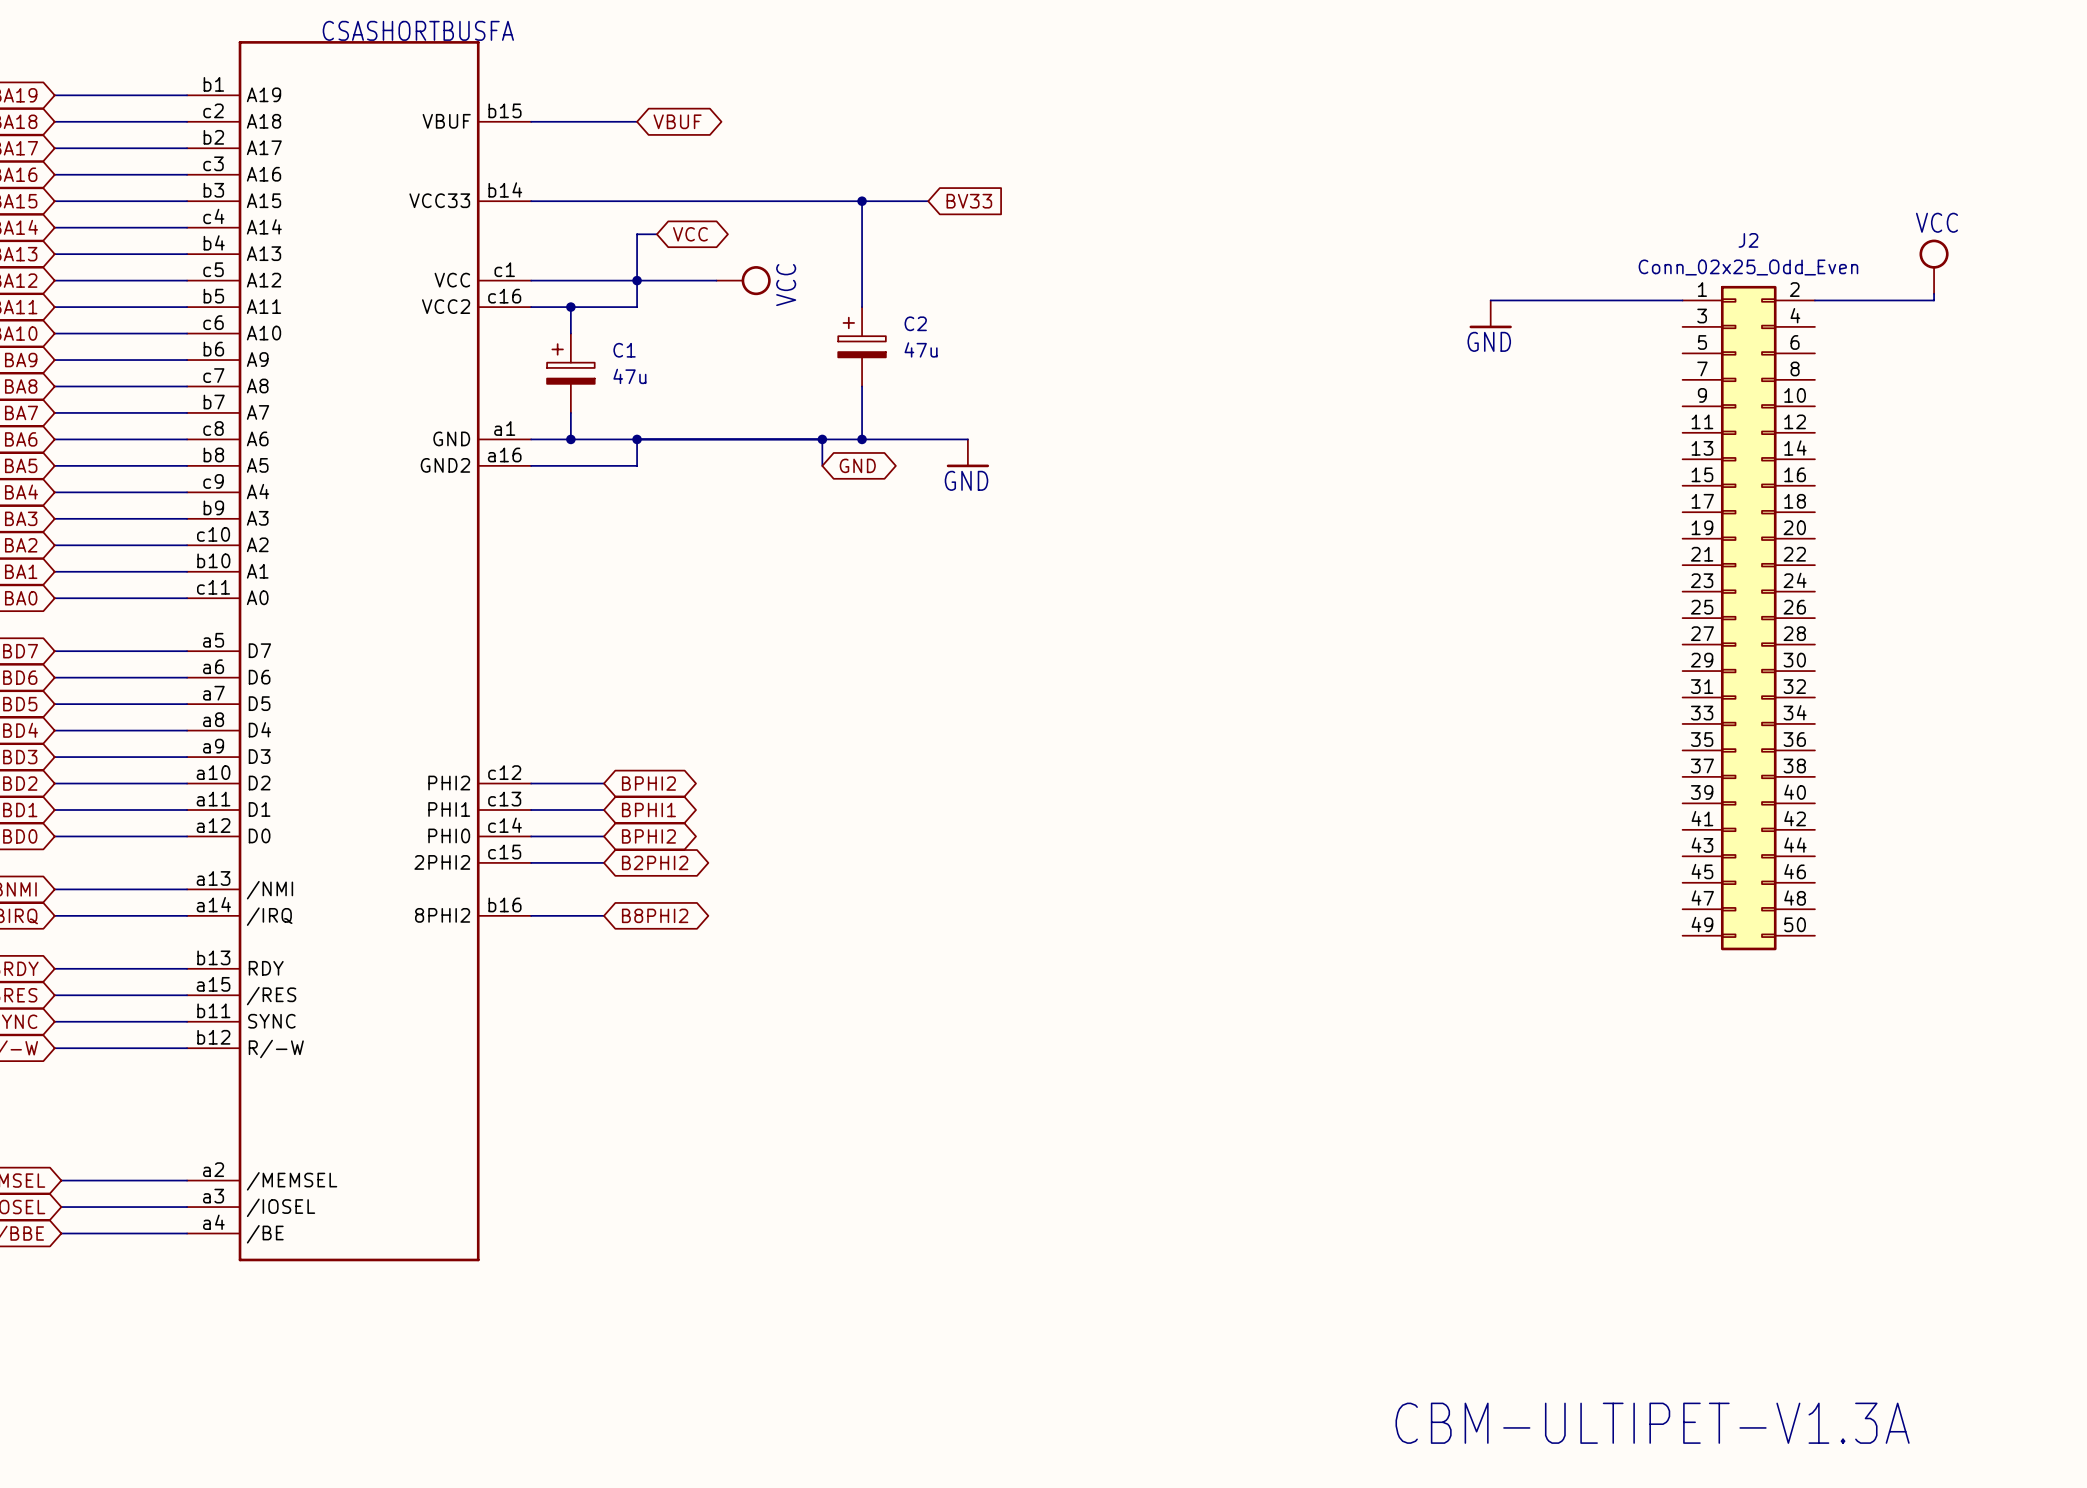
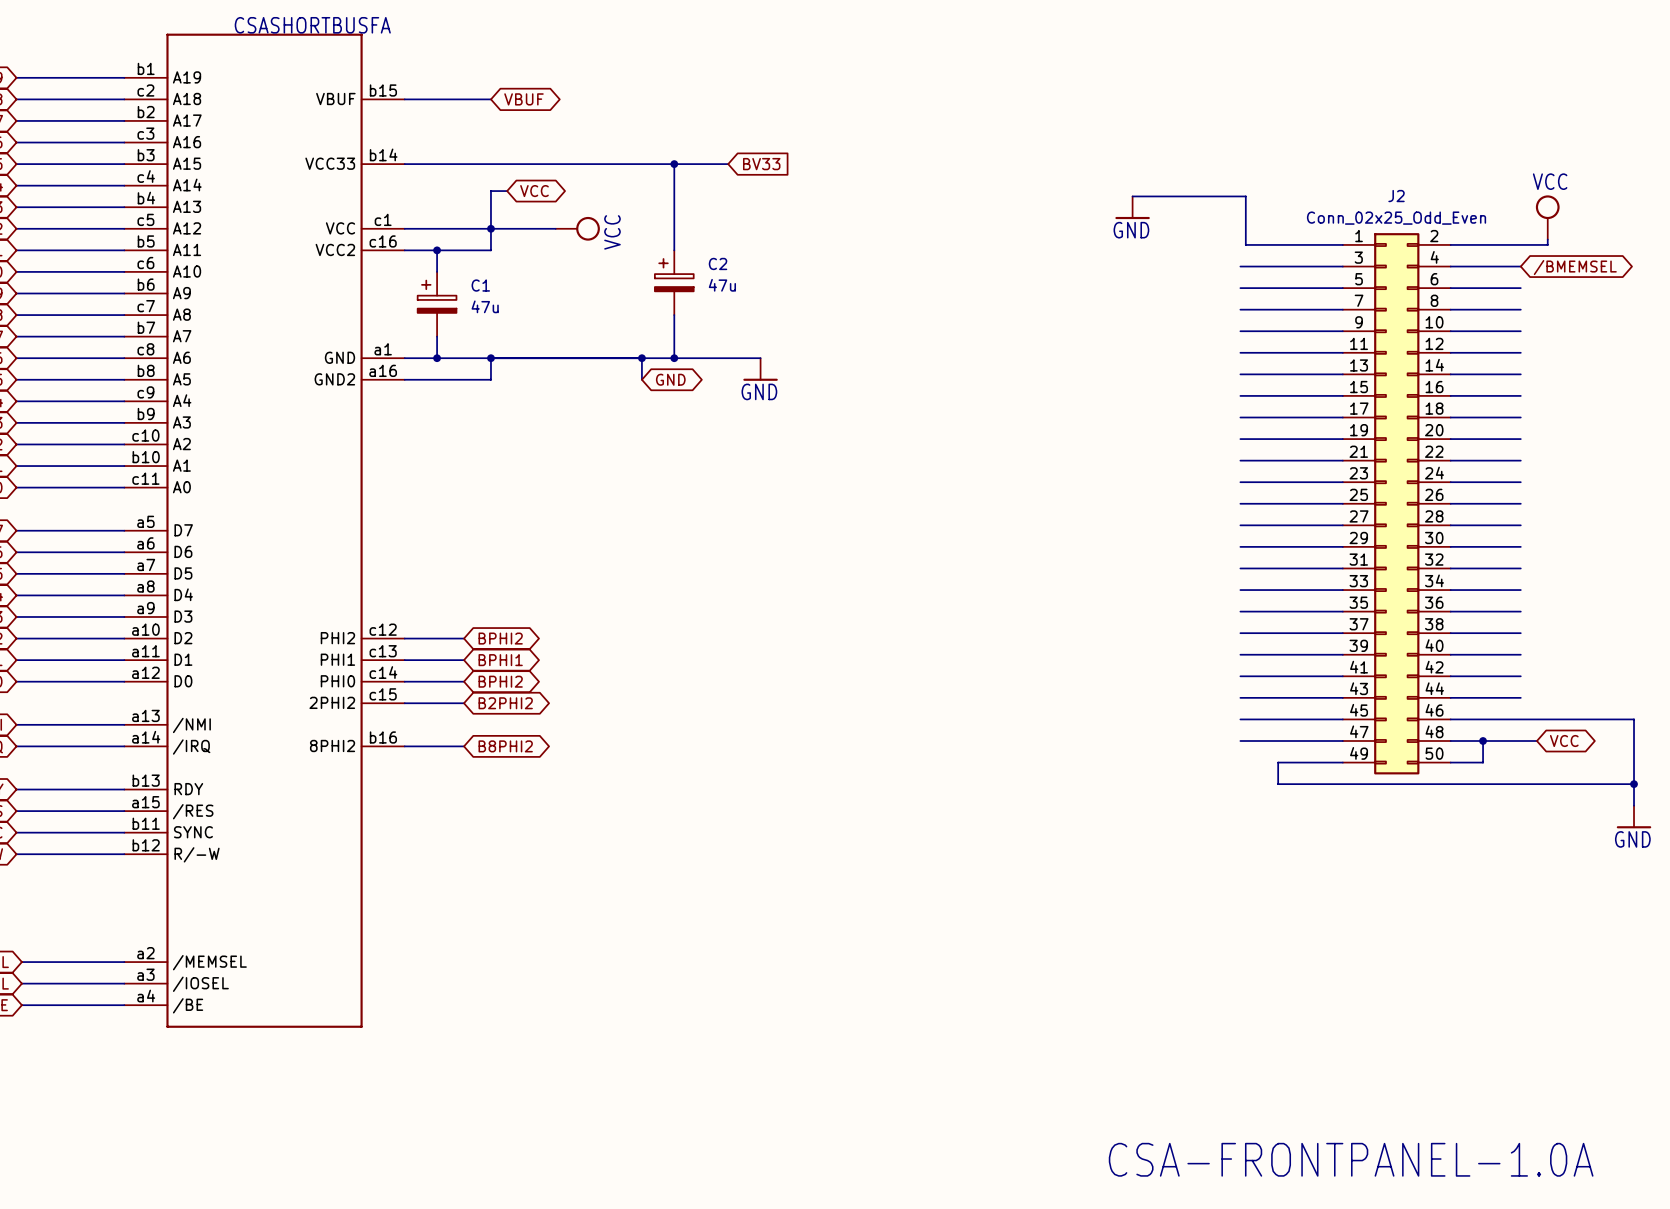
wire: (1490, 300) (1563, 300) -> (1132, 196) (1245, 196) (1245, 244)
power symbol position: GND (1490, 314) -> GND (1132, 207)
wire: none -> (1240, 266) (1342, 266)
wire: none -> (1450, 266) (1520, 266)
global label: none -> /BMEMSEL (1575, 267)
wire: none -> (1240, 288) (1342, 288)
wire: none -> (1450, 288) (1520, 288)
wire: none -> (1240, 309) (1342, 309)
wire: none -> (1450, 309) (1520, 309)
wire: none -> (1240, 331) (1342, 331)
wire: none -> (1450, 331) (1520, 331)
wire: none -> (1240, 352) (1342, 352)
wire: none -> (1450, 352) (1520, 352)
wire: none -> (1240, 374) (1342, 374)
wire: none -> (1450, 374) (1520, 374)
wire: none -> (1240, 395) (1342, 395)
wire: none -> (1450, 395) (1520, 395)
wire: none -> (1240, 417) (1342, 417)
wire: none -> (1450, 417) (1520, 417)
wire: none -> (1240, 439) (1342, 439)
wire: none -> (1450, 439) (1520, 439)
wire: none -> (1240, 460) (1342, 460)
wire: none -> (1450, 460) (1520, 460)
wire: none -> (1240, 482) (1342, 482)
wire: none -> (1450, 482) (1520, 482)
wire: none -> (1240, 503) (1342, 503)
wire: none -> (1450, 503) (1520, 503)
wire: none -> (1240, 525) (1342, 525)
wire: none -> (1450, 525) (1520, 525)
wire: none -> (1240, 546) (1342, 546)
wire: none -> (1450, 546) (1520, 546)
wire: none -> (1240, 568) (1342, 568)
wire: none -> (1450, 568) (1520, 568)
wire: none -> (1240, 590) (1342, 590)
wire: none -> (1450, 590) (1520, 590)
wire: none -> (1240, 611) (1342, 611)
wire: none -> (1450, 611) (1520, 611)
wire: none -> (1240, 633) (1342, 633)
wire: none -> (1450, 633) (1520, 633)
wire: none -> (1240, 654) (1342, 654)
wire: none -> (1450, 654) (1520, 654)
wire: none -> (1240, 676) (1342, 676)
wire: none -> (1450, 676) (1520, 676)
wire: none -> (1240, 697) (1342, 697)
wire: none -> (1450, 697) (1520, 697)
wire: none -> (1240, 719) (1342, 719)
wire: none -> (1450, 719) (1634, 719) (1634, 805)
wire: none -> (1240, 741) (1342, 741)
wire: none -> (1450, 741) (1536, 741)
wire: none -> (1483, 741) (1483, 762) (1450, 762)
junction: none -> (1483, 741)
global label: none -> VCC (1564, 741)
wire: none -> (1342, 762) (1278, 762) (1278, 784) (1634, 784)
junction: none -> (1634, 784)
power symbol: none -> GND (1634, 817)
text: CBM-ULTIPET-V1.3A (1652, 1423) -> CSA-FRONTPANEL-1.0A (1351, 1159)

